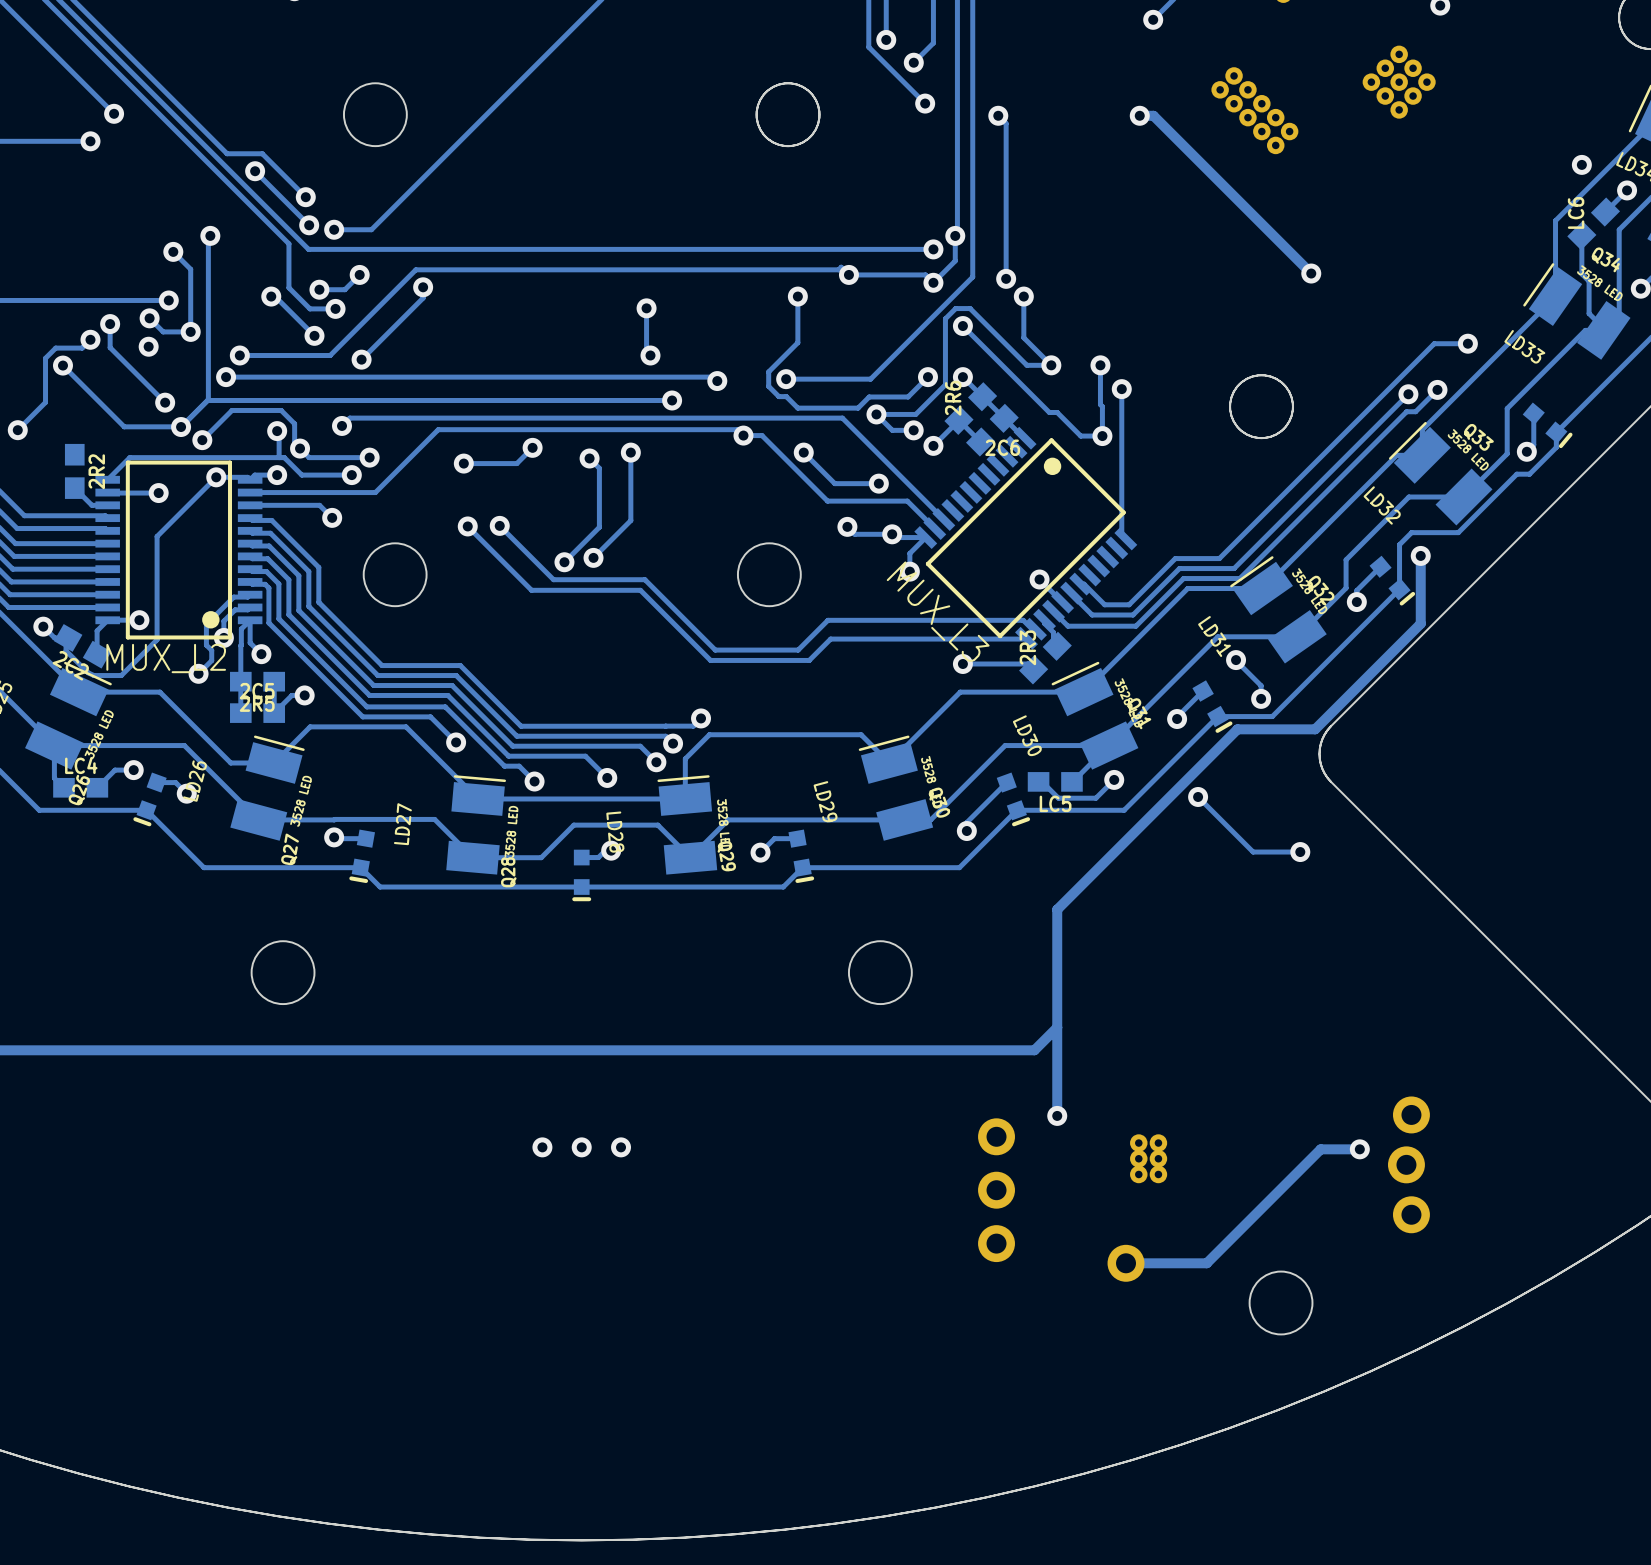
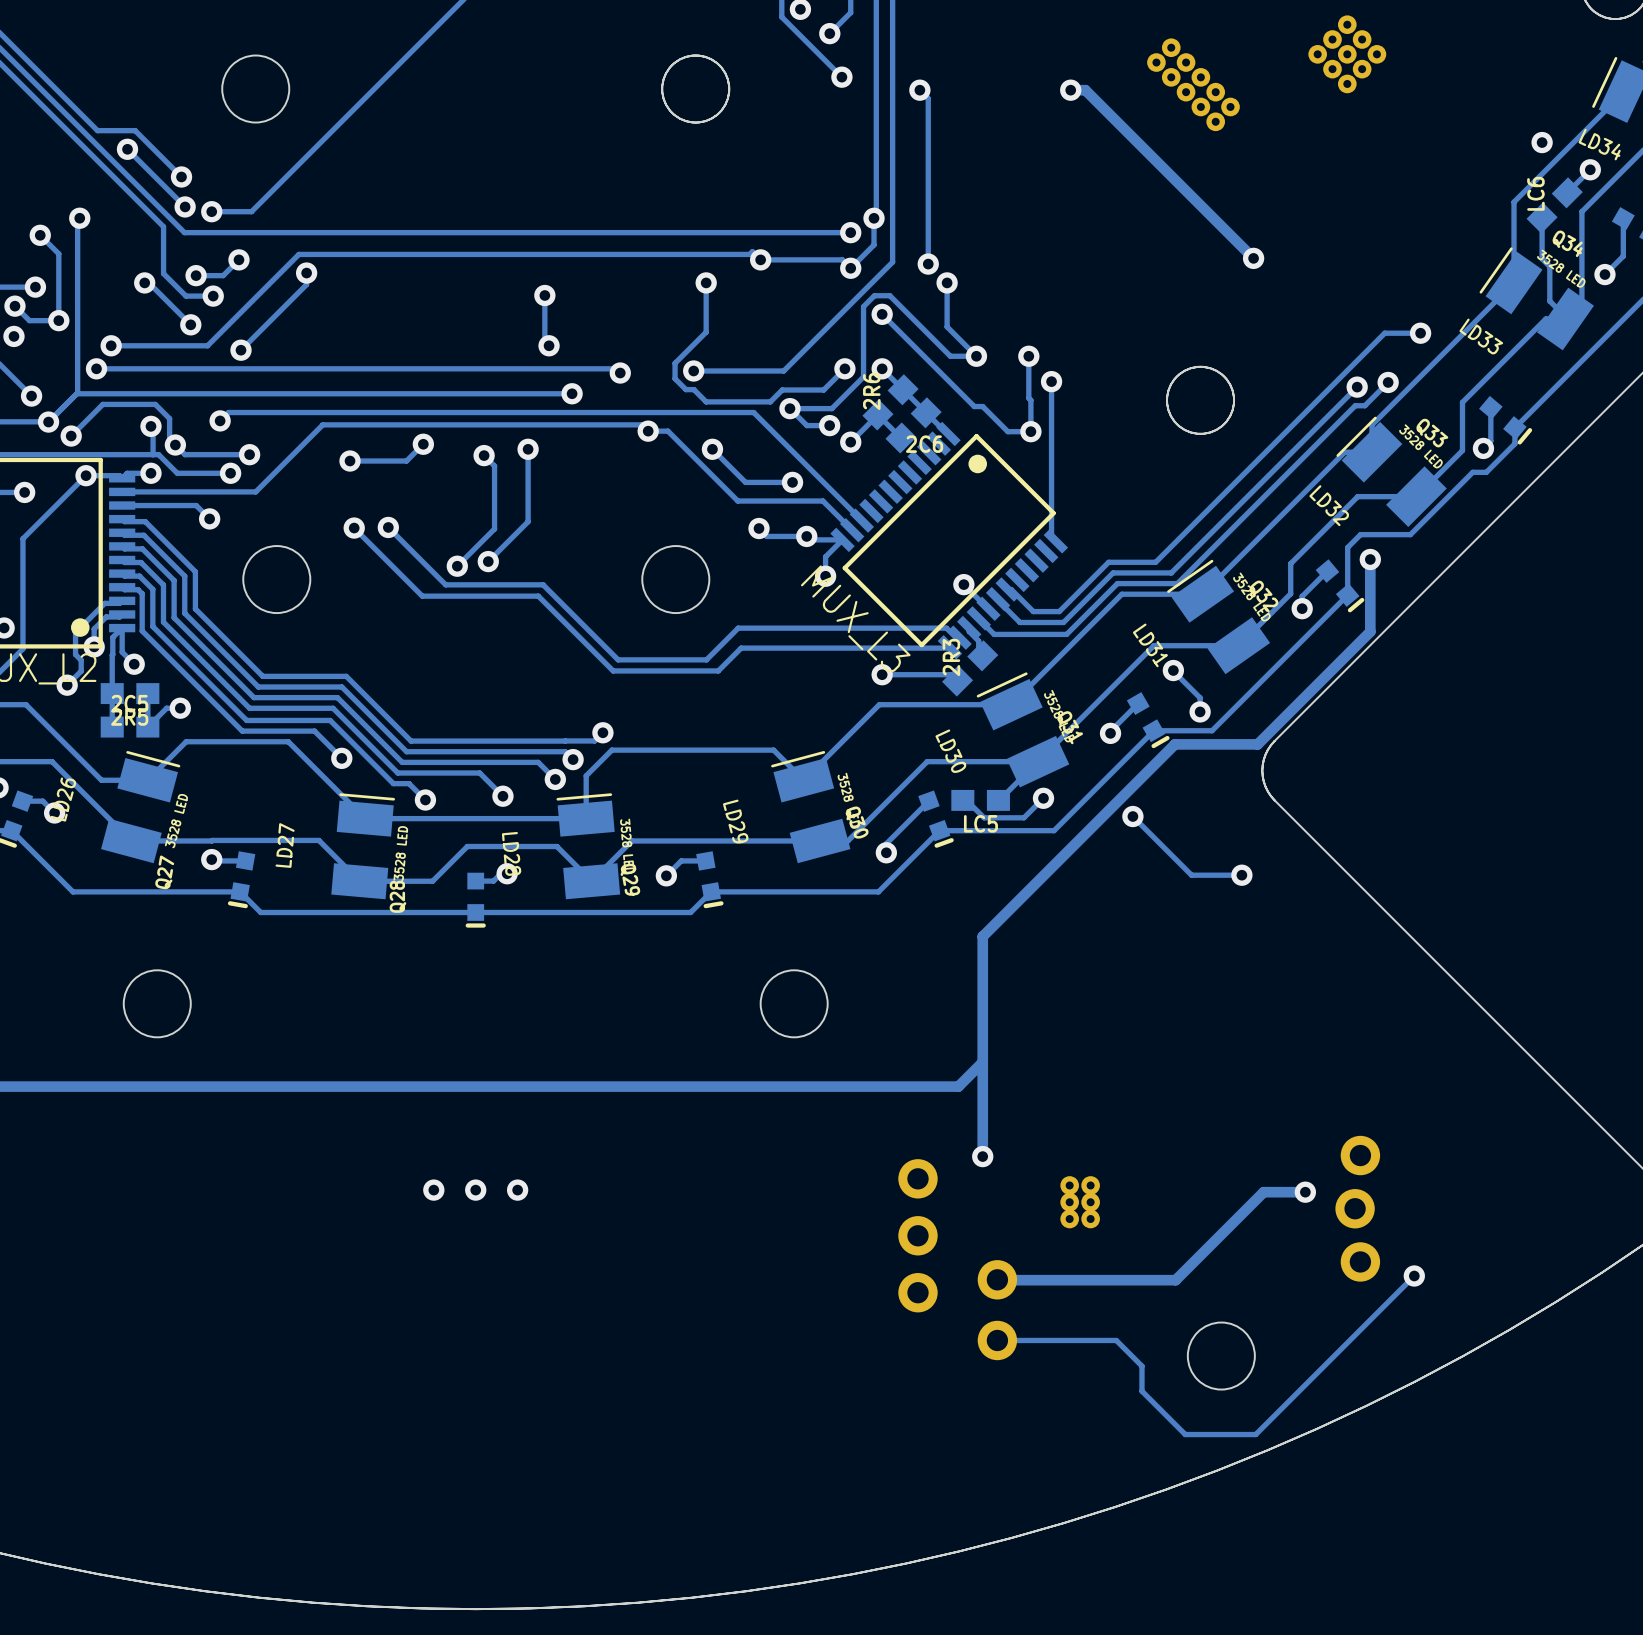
track: none -> (1414, 1275) (1255, 1434) (1185, 1434) (1141, 1391) (1141, 1366) (1116, 1340) (997, 1340)
via: none -> (1414, 1275)
track: (1238, 1231) (1206, 1263) (1126, 1263) -> (1175, 1280) (997, 1279)
part: none -> (997, 1310)
part: (1126, 1263) -> none

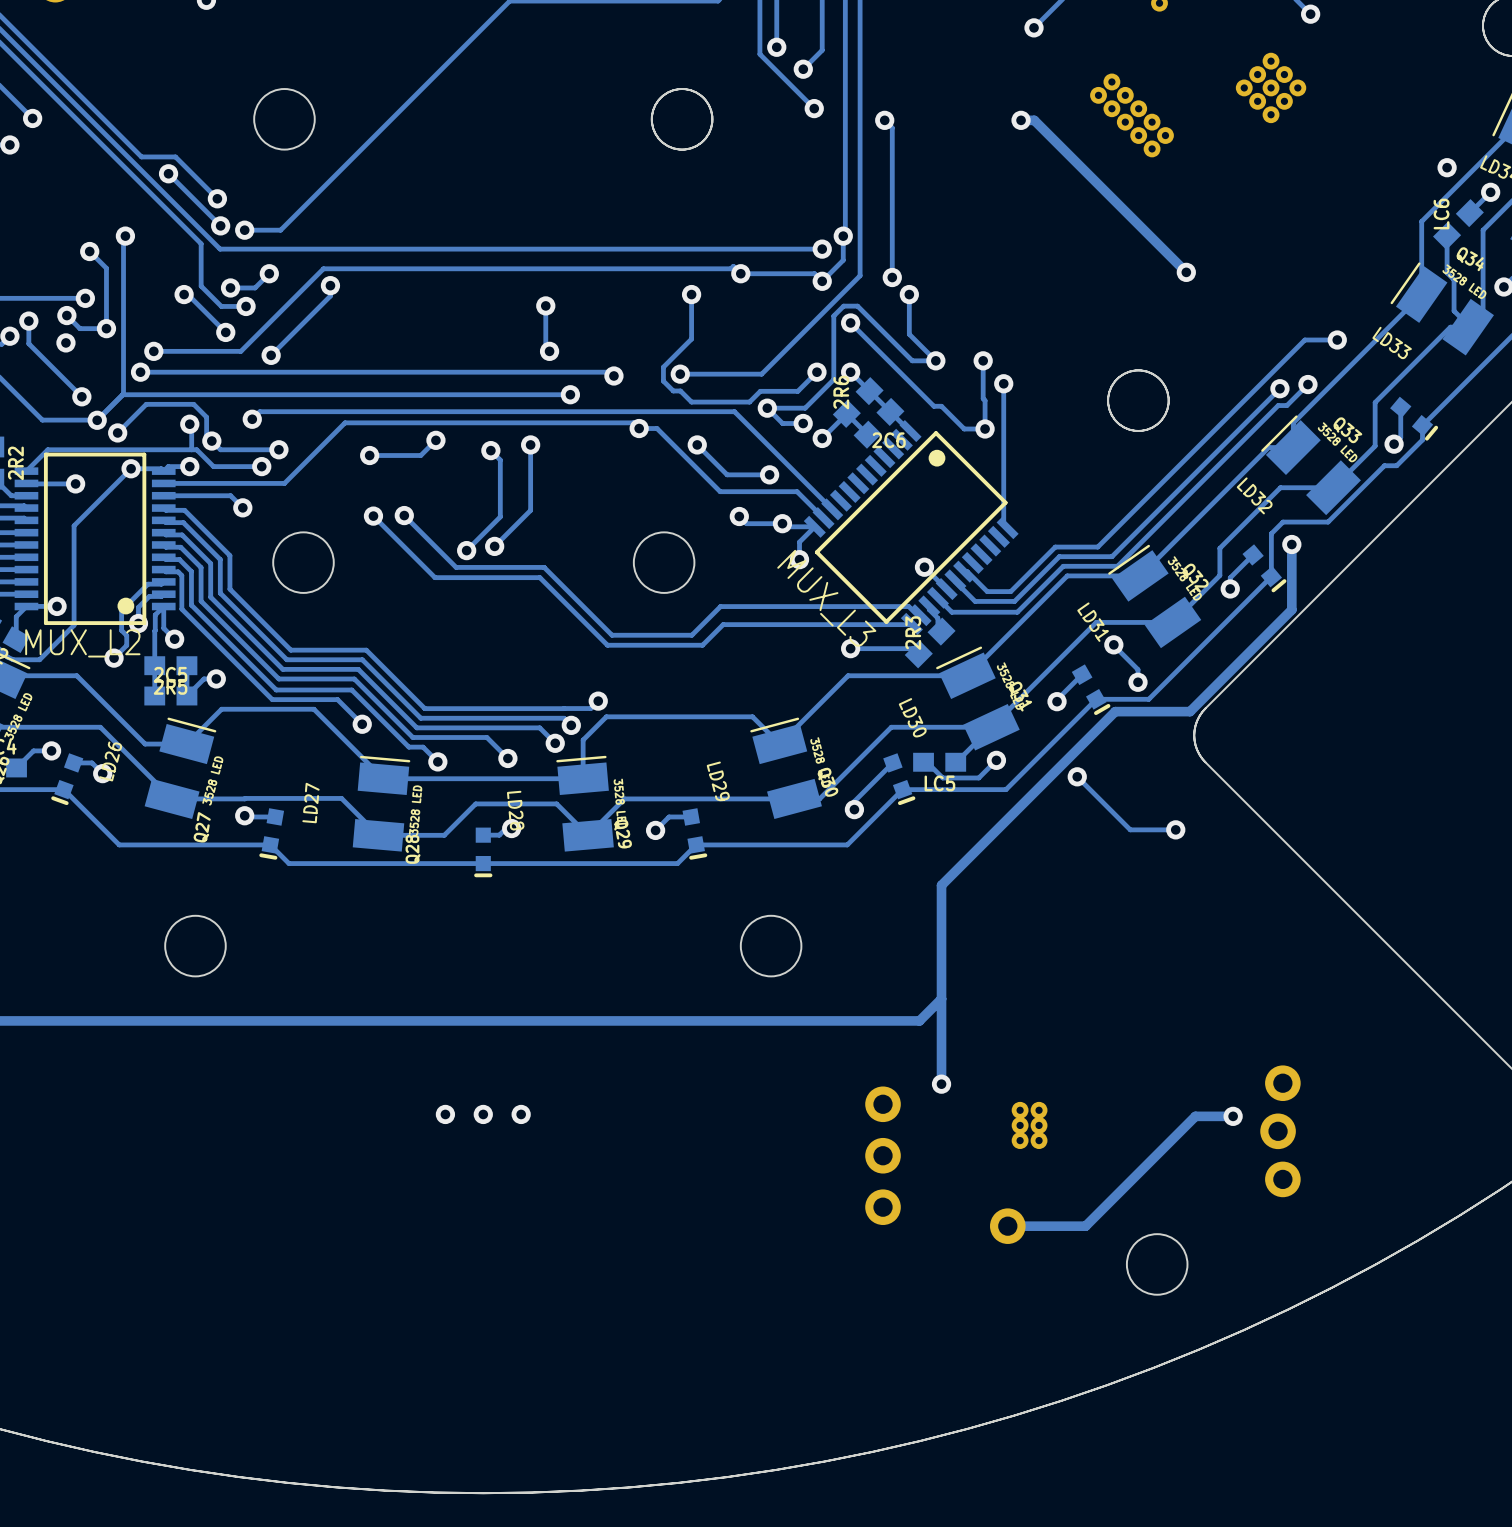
track: (1414, 1275) (1255, 1434) (1185, 1434) (1141, 1391) (1141, 1366) (1116, 1340) (997, 1340) -> none
via: (1414, 1275) -> none
track: (997, 1279) (1175, 1280) -> (1007, 1226) (1085, 1226) (1115, 1195)
part: (997, 1310) -> none
part: none -> (1007, 1226)

